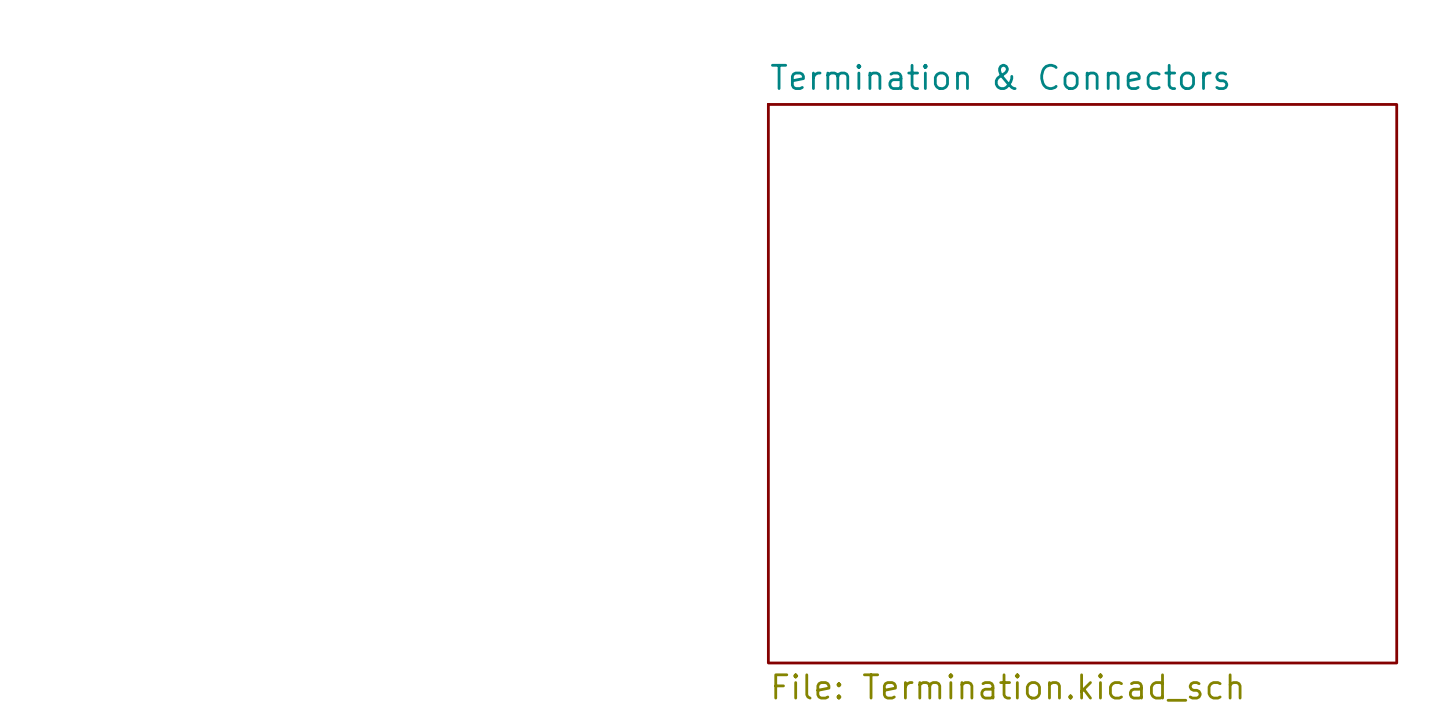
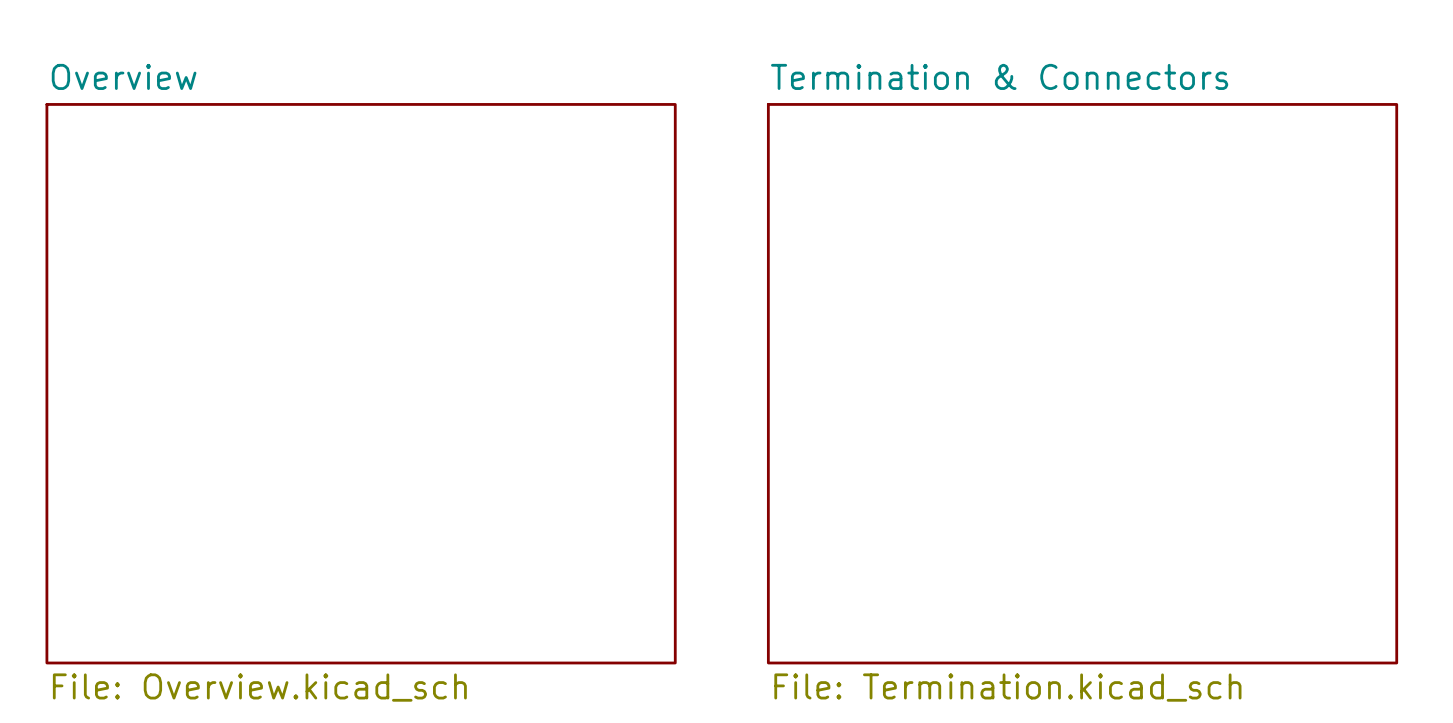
sheet Overview: none -> File: Overview.kicad_sch (361, 383)

